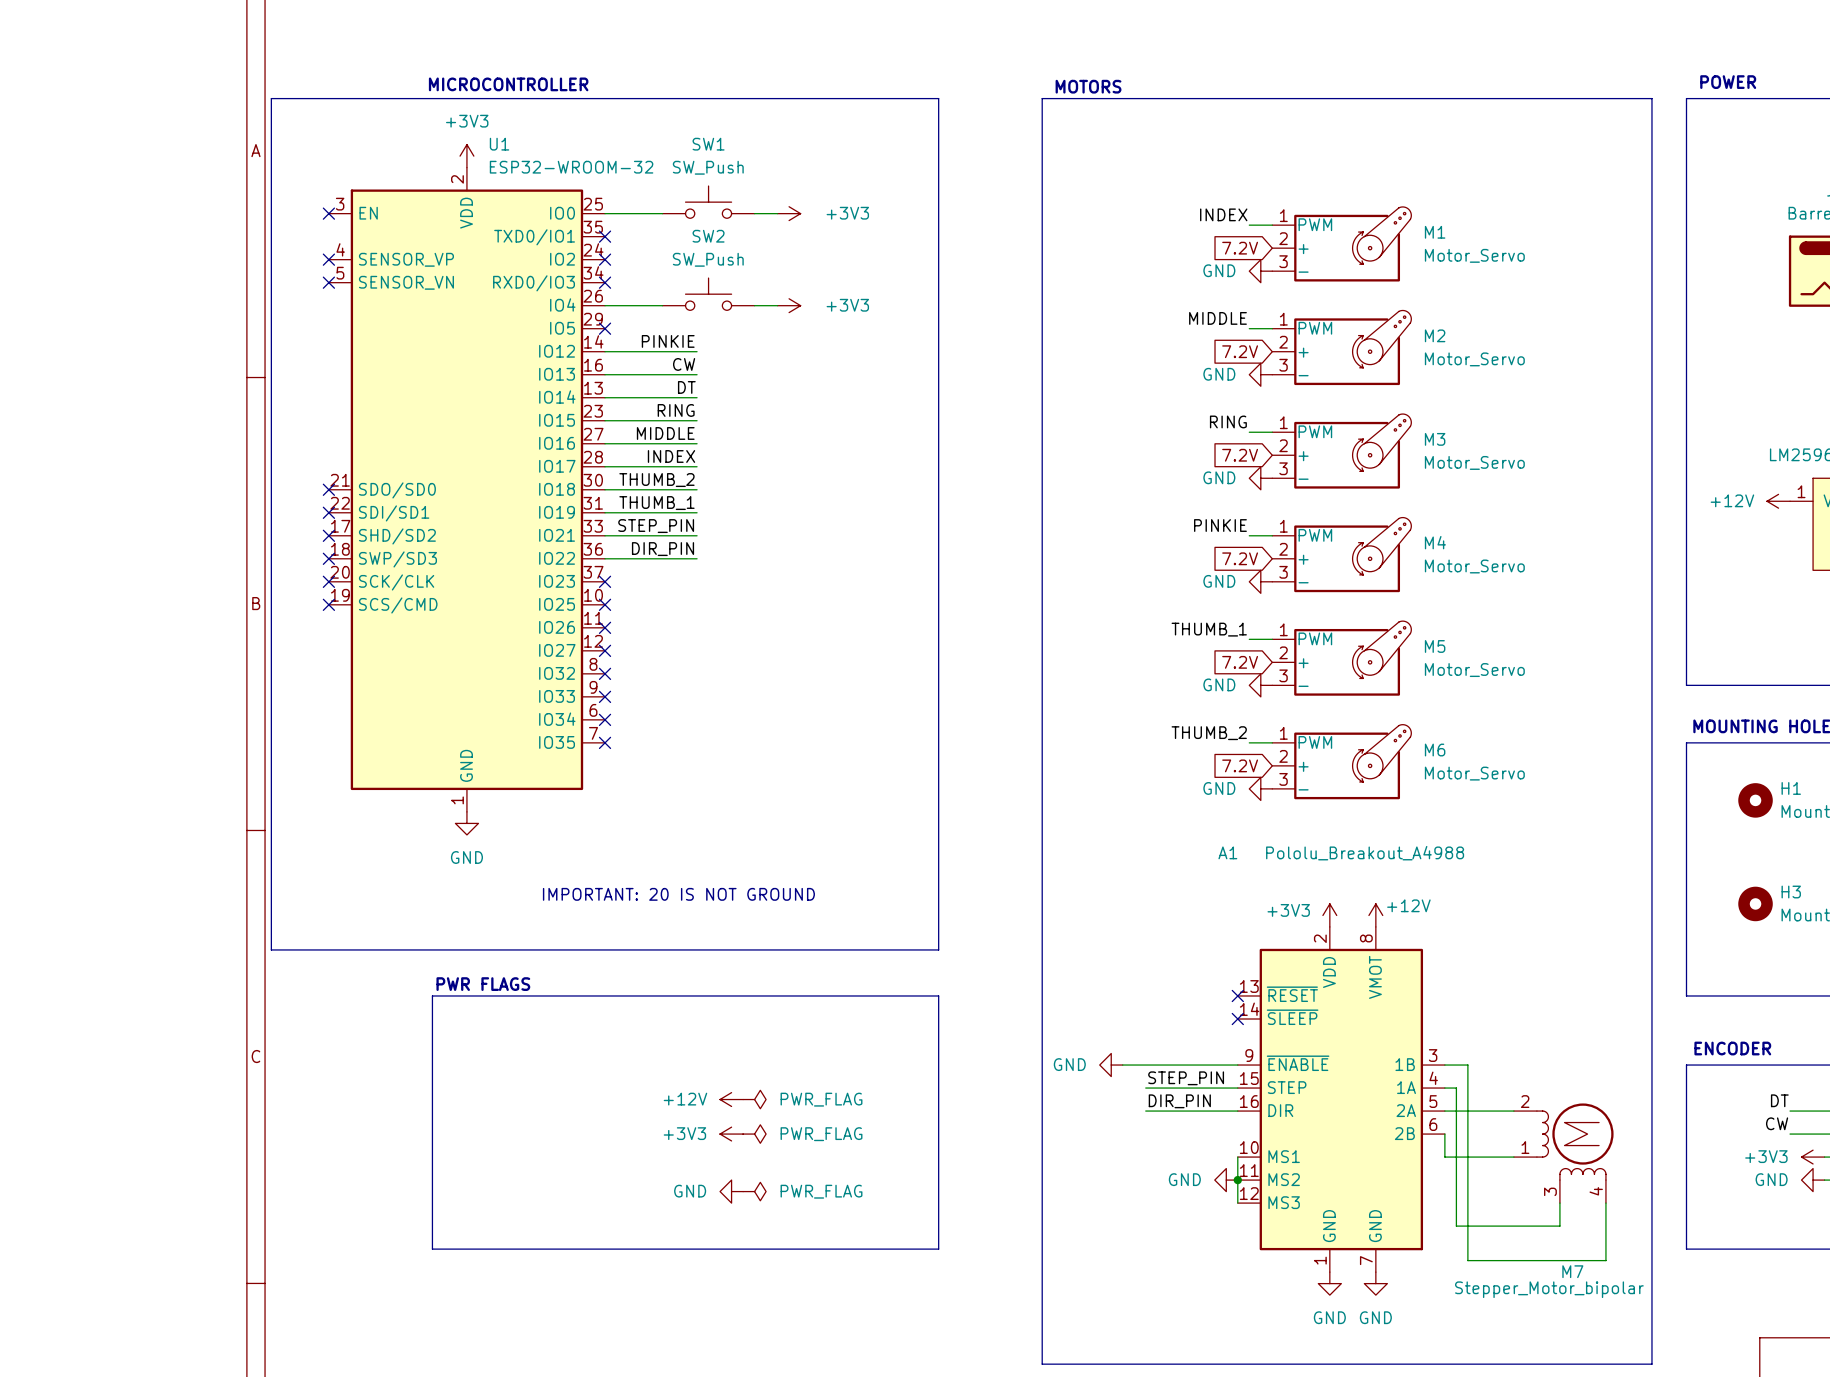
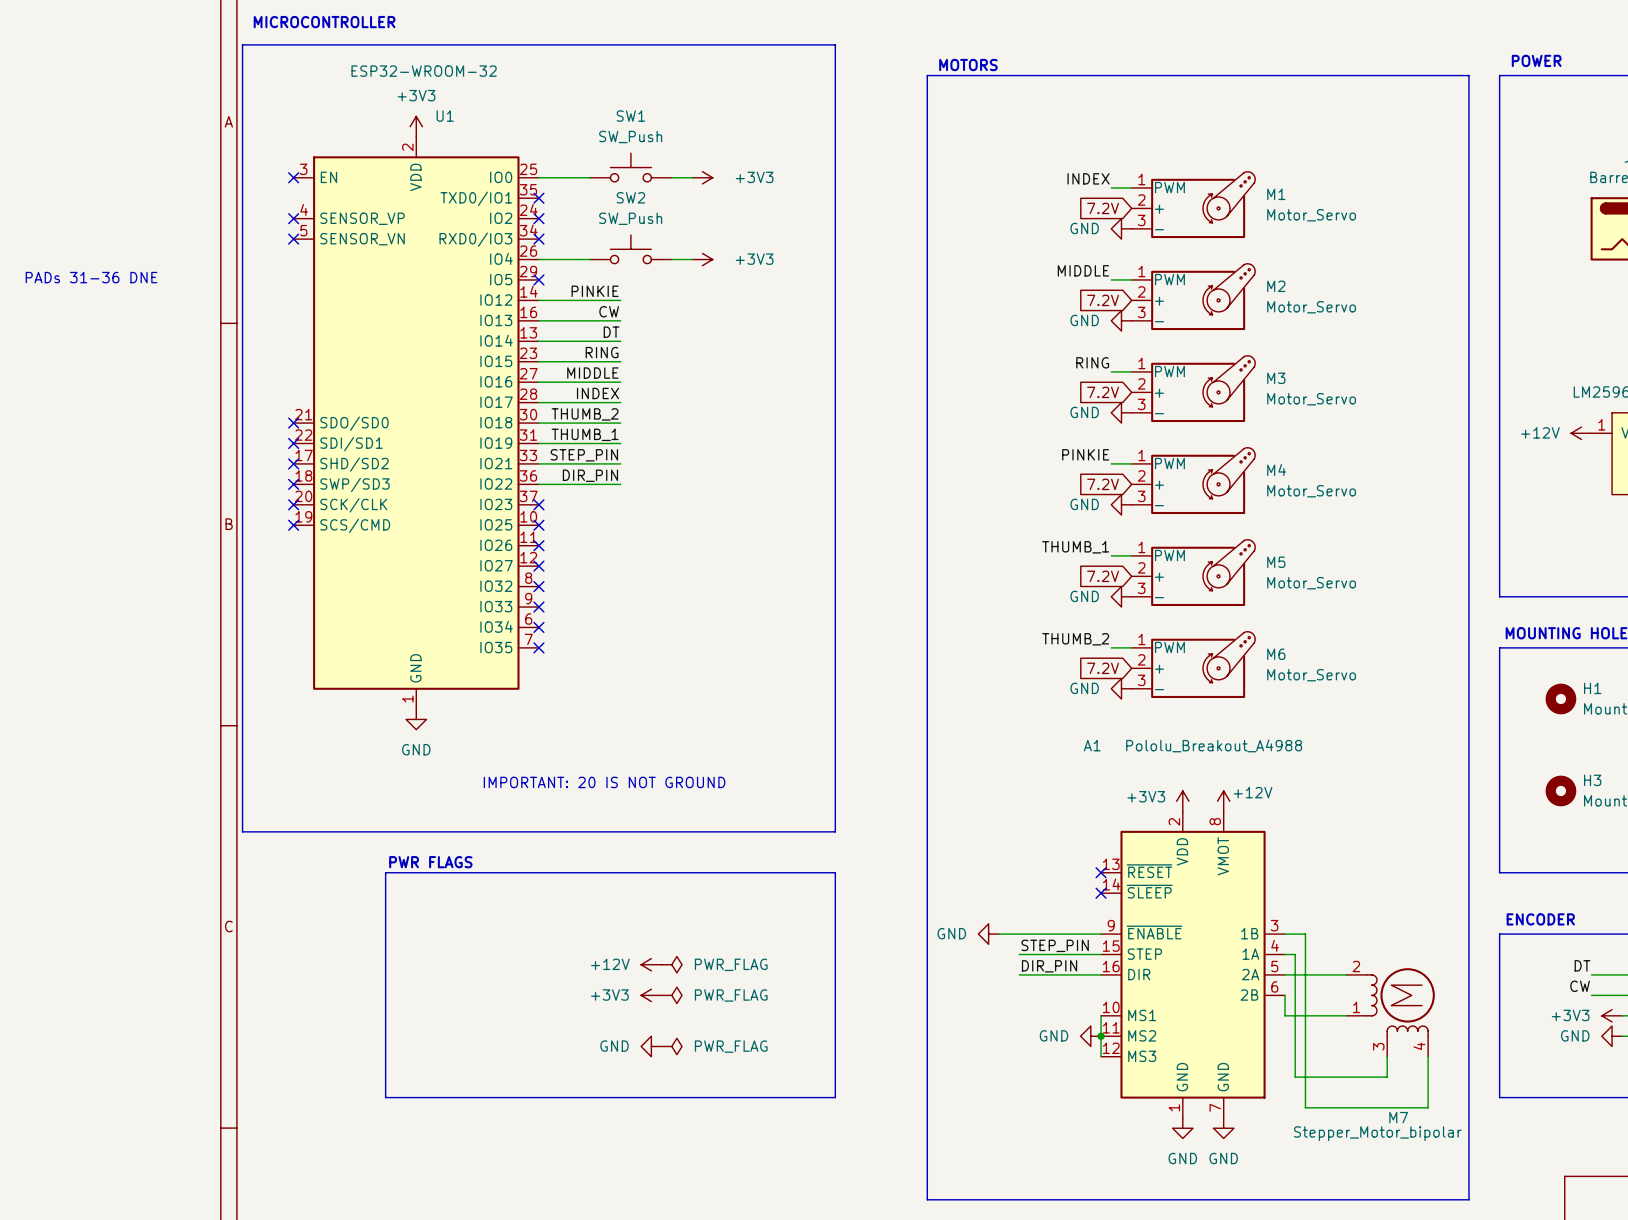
text position: MICROCONTROLLER (508, 84) -> MICROCONTROLLER (324, 22)
line: (271, 98) (938, 98) -> (242, 75) (242, 44) (835, 44) (835, 75)
U1 value position: ESP32-WROOM-32 (571, 167) -> ESP32-WROOM-32 (424, 71)
text: none -> PADs 31-36 DNE (91, 277)

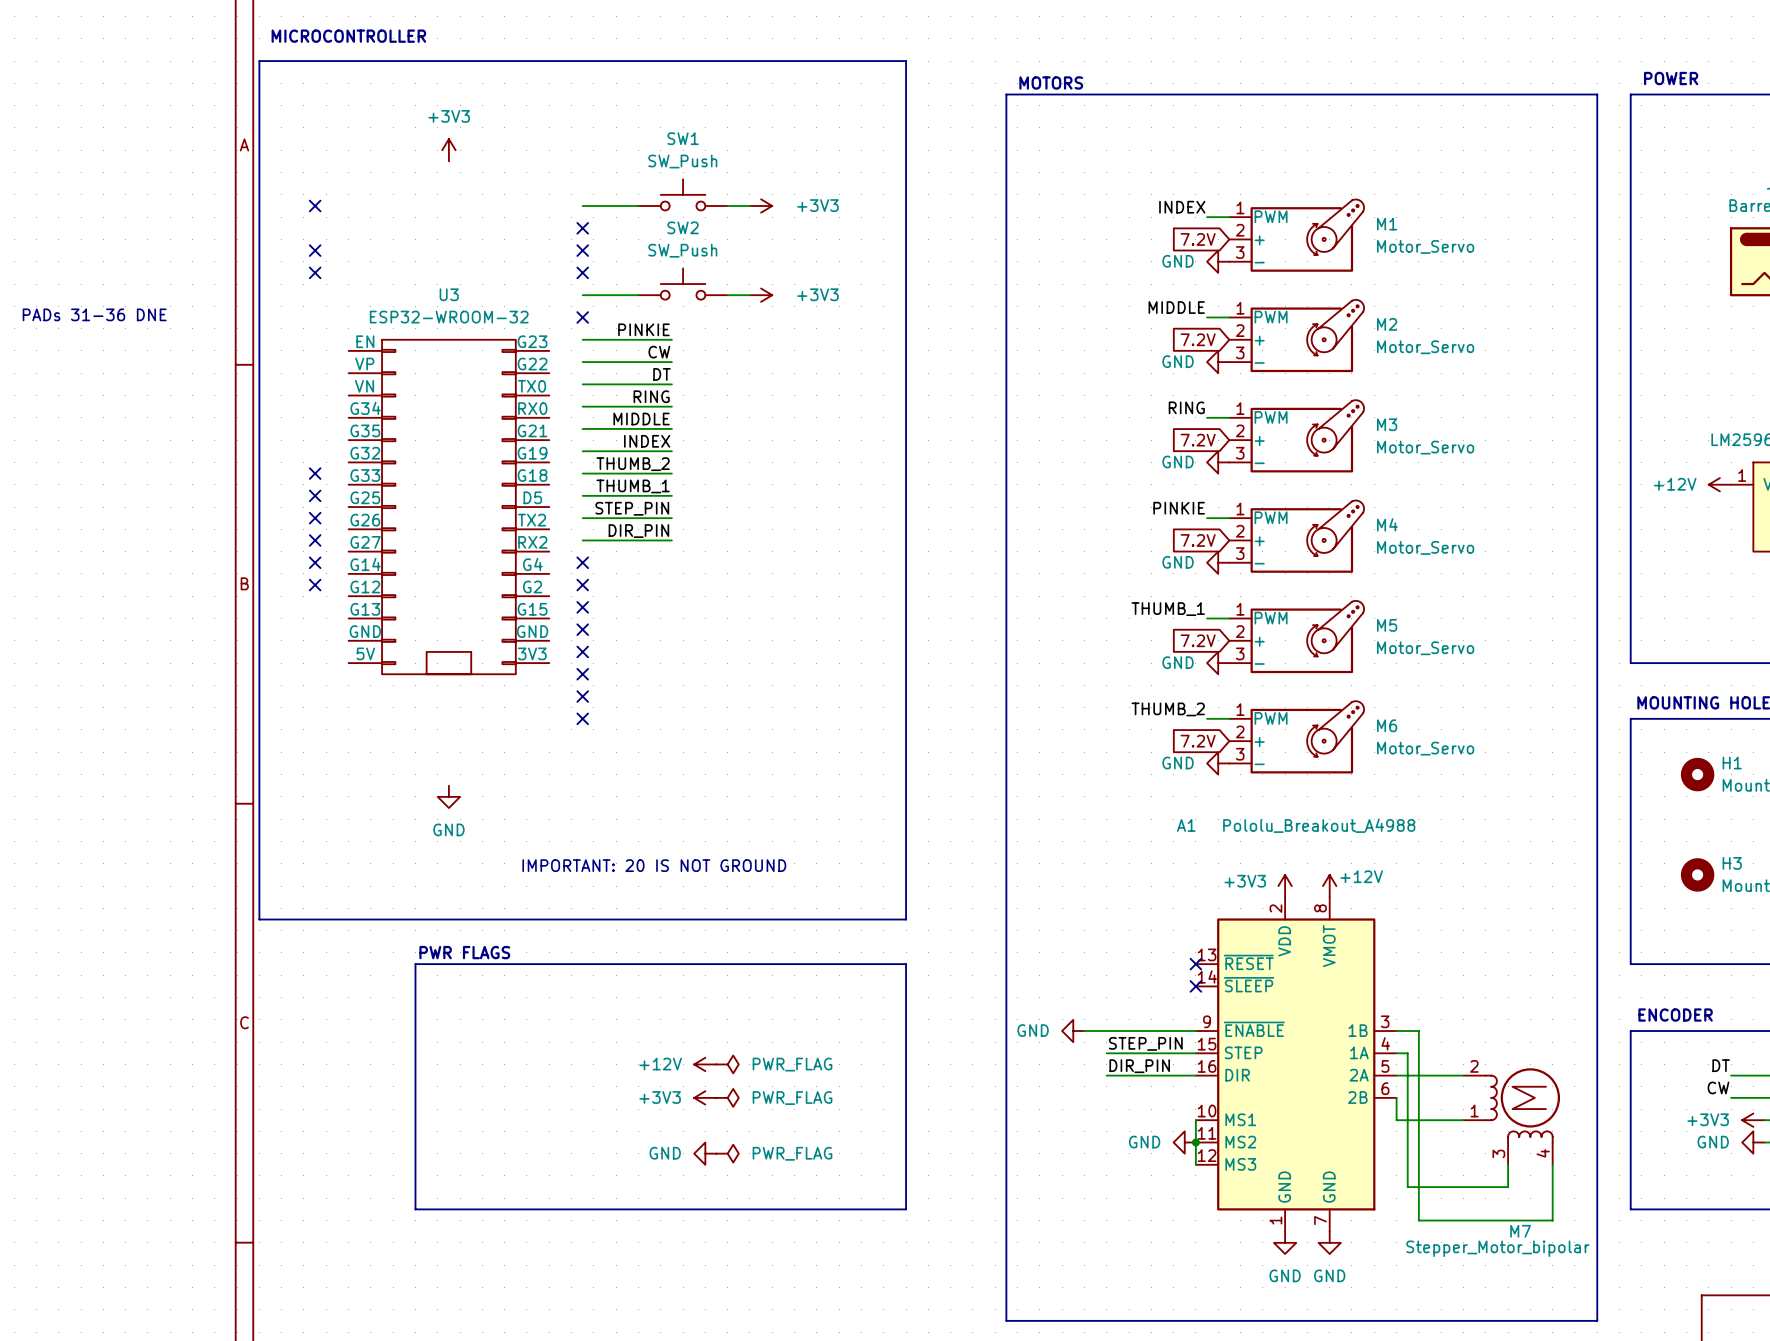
U1: ESP32-WROOM-32 (416, 423) -> none
U3: none -> ESP32-WROOM-32 (448, 507)

